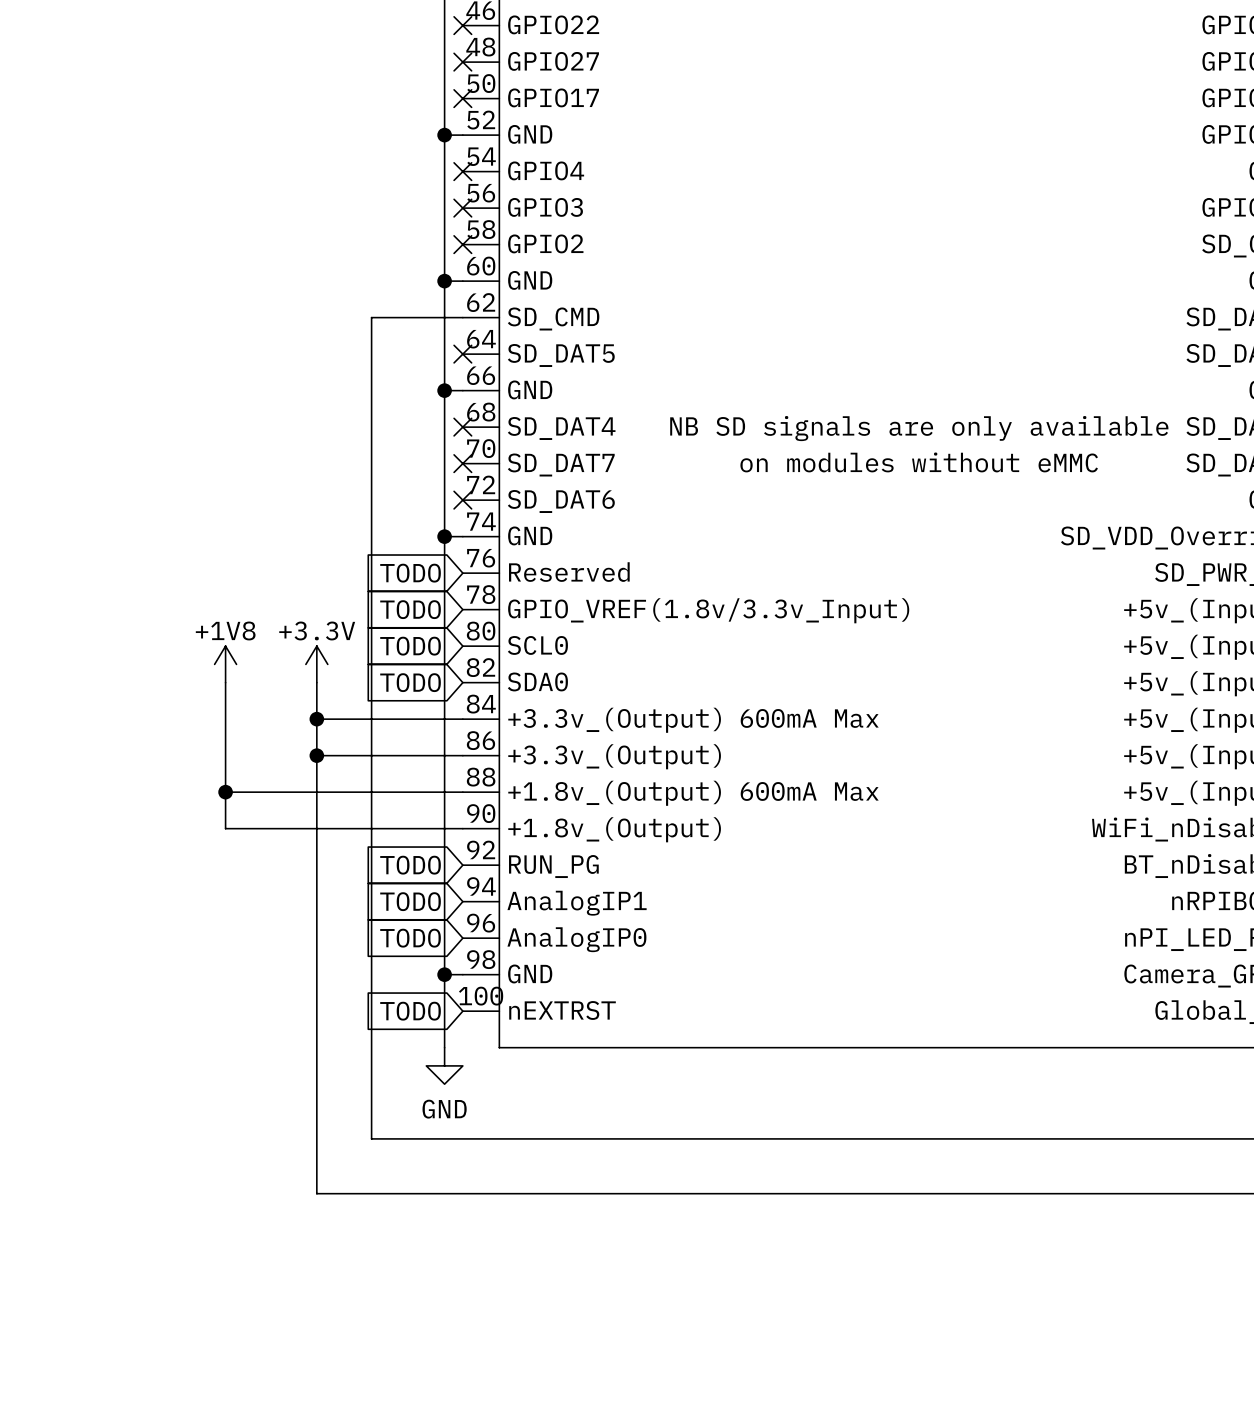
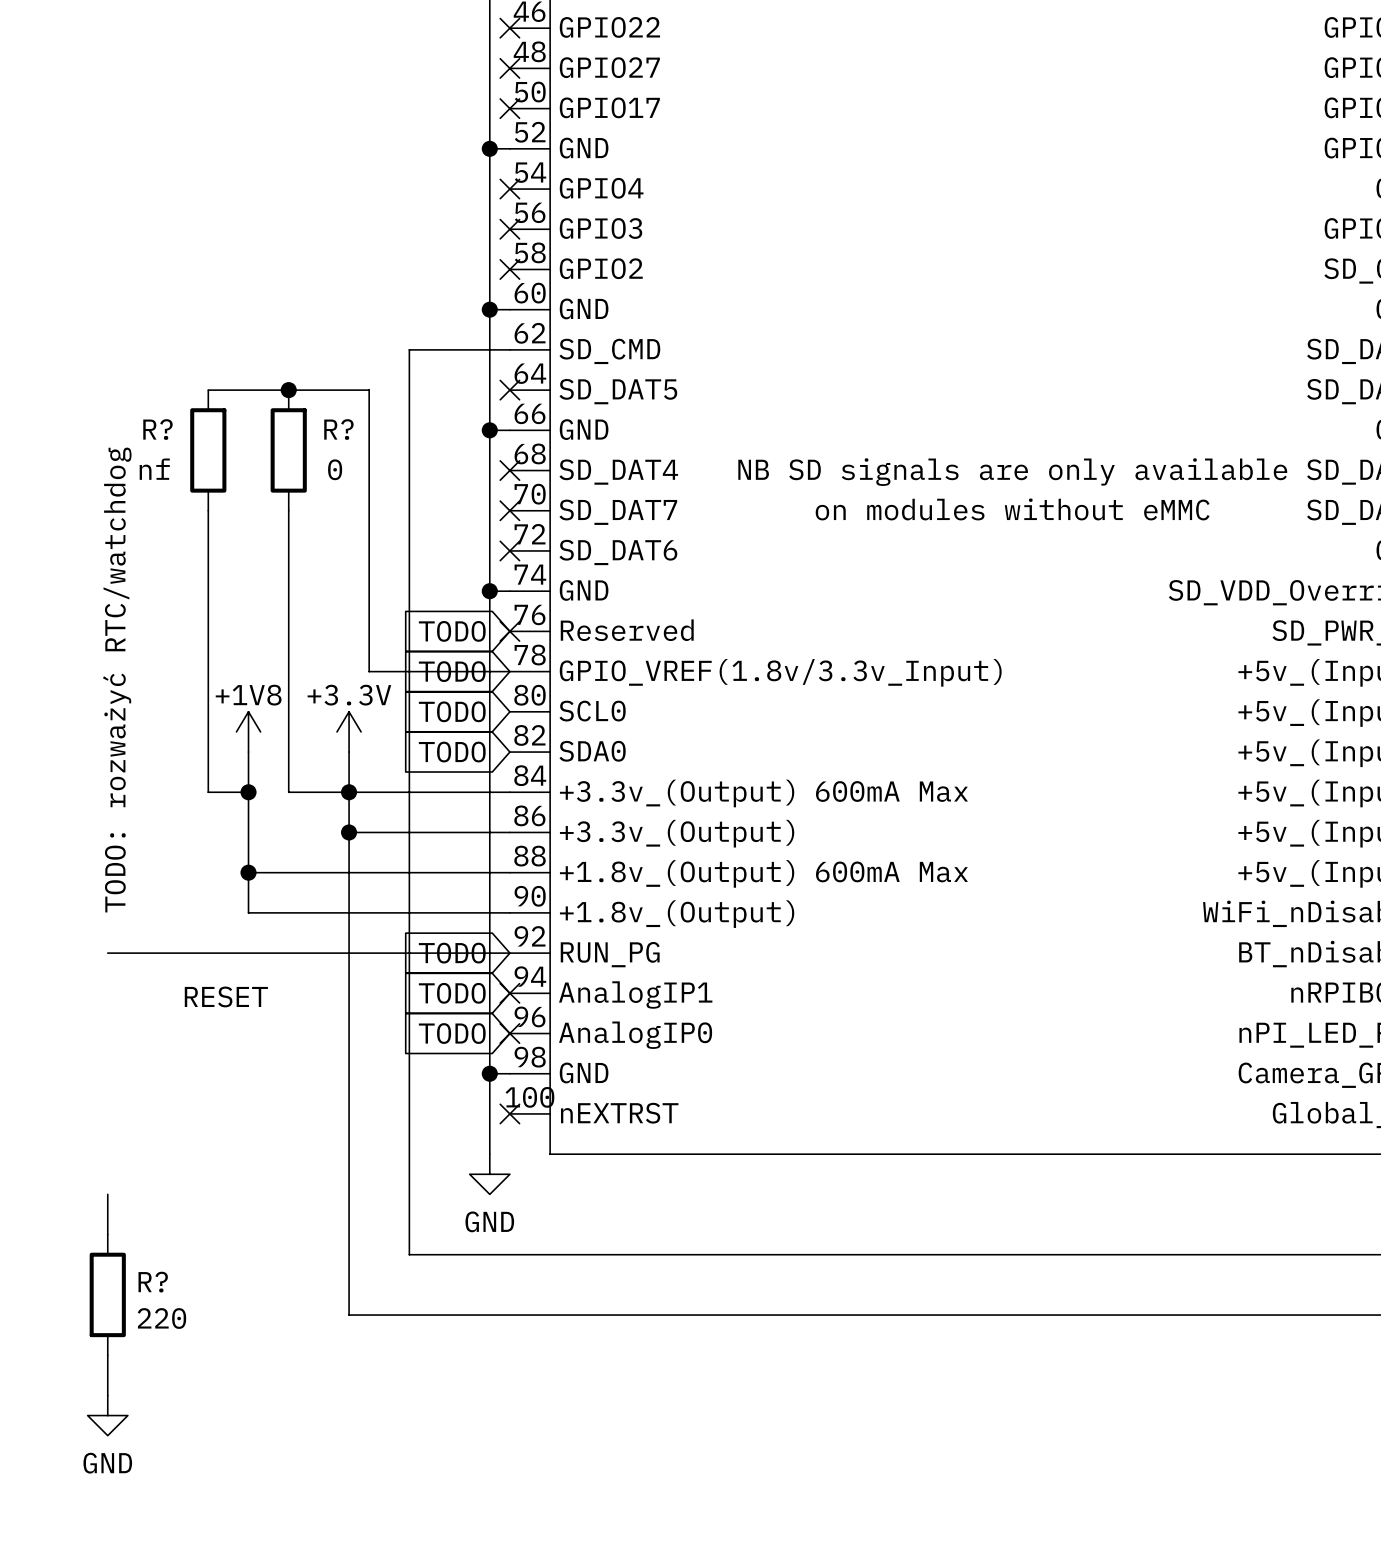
wire: none -> (208, 390) (369, 390) (369, 671) (509, 671)
junction: none -> (288, 390)
R?: none -> nf (208, 450)
R?: none -> 0 (288, 450)
wire: none -> (208, 510) (208, 792) (248, 792)
wire: none -> (288, 510) (288, 792) (349, 792)
no-connect mark: none -> (509, 631)
text: none -> TODO: rozważyć RTC/watchdog (117, 680)
junction: none -> (248, 792)
wire: none -> (107, 953) (509, 953)
no-connect mark: none -> (509, 993)
text: none -> RESET (226, 996)
no-connect mark: none -> (509, 1033)
global label: TODO (410, 1011) -> none
no-connect mark: none -> (509, 1113)
wire: none -> (107, 1194) (107, 1234)
R?: none -> 220 (107, 1294)
wire: none -> (107, 1355) (107, 1395)
power symbol: none -> GND (107, 1415)

